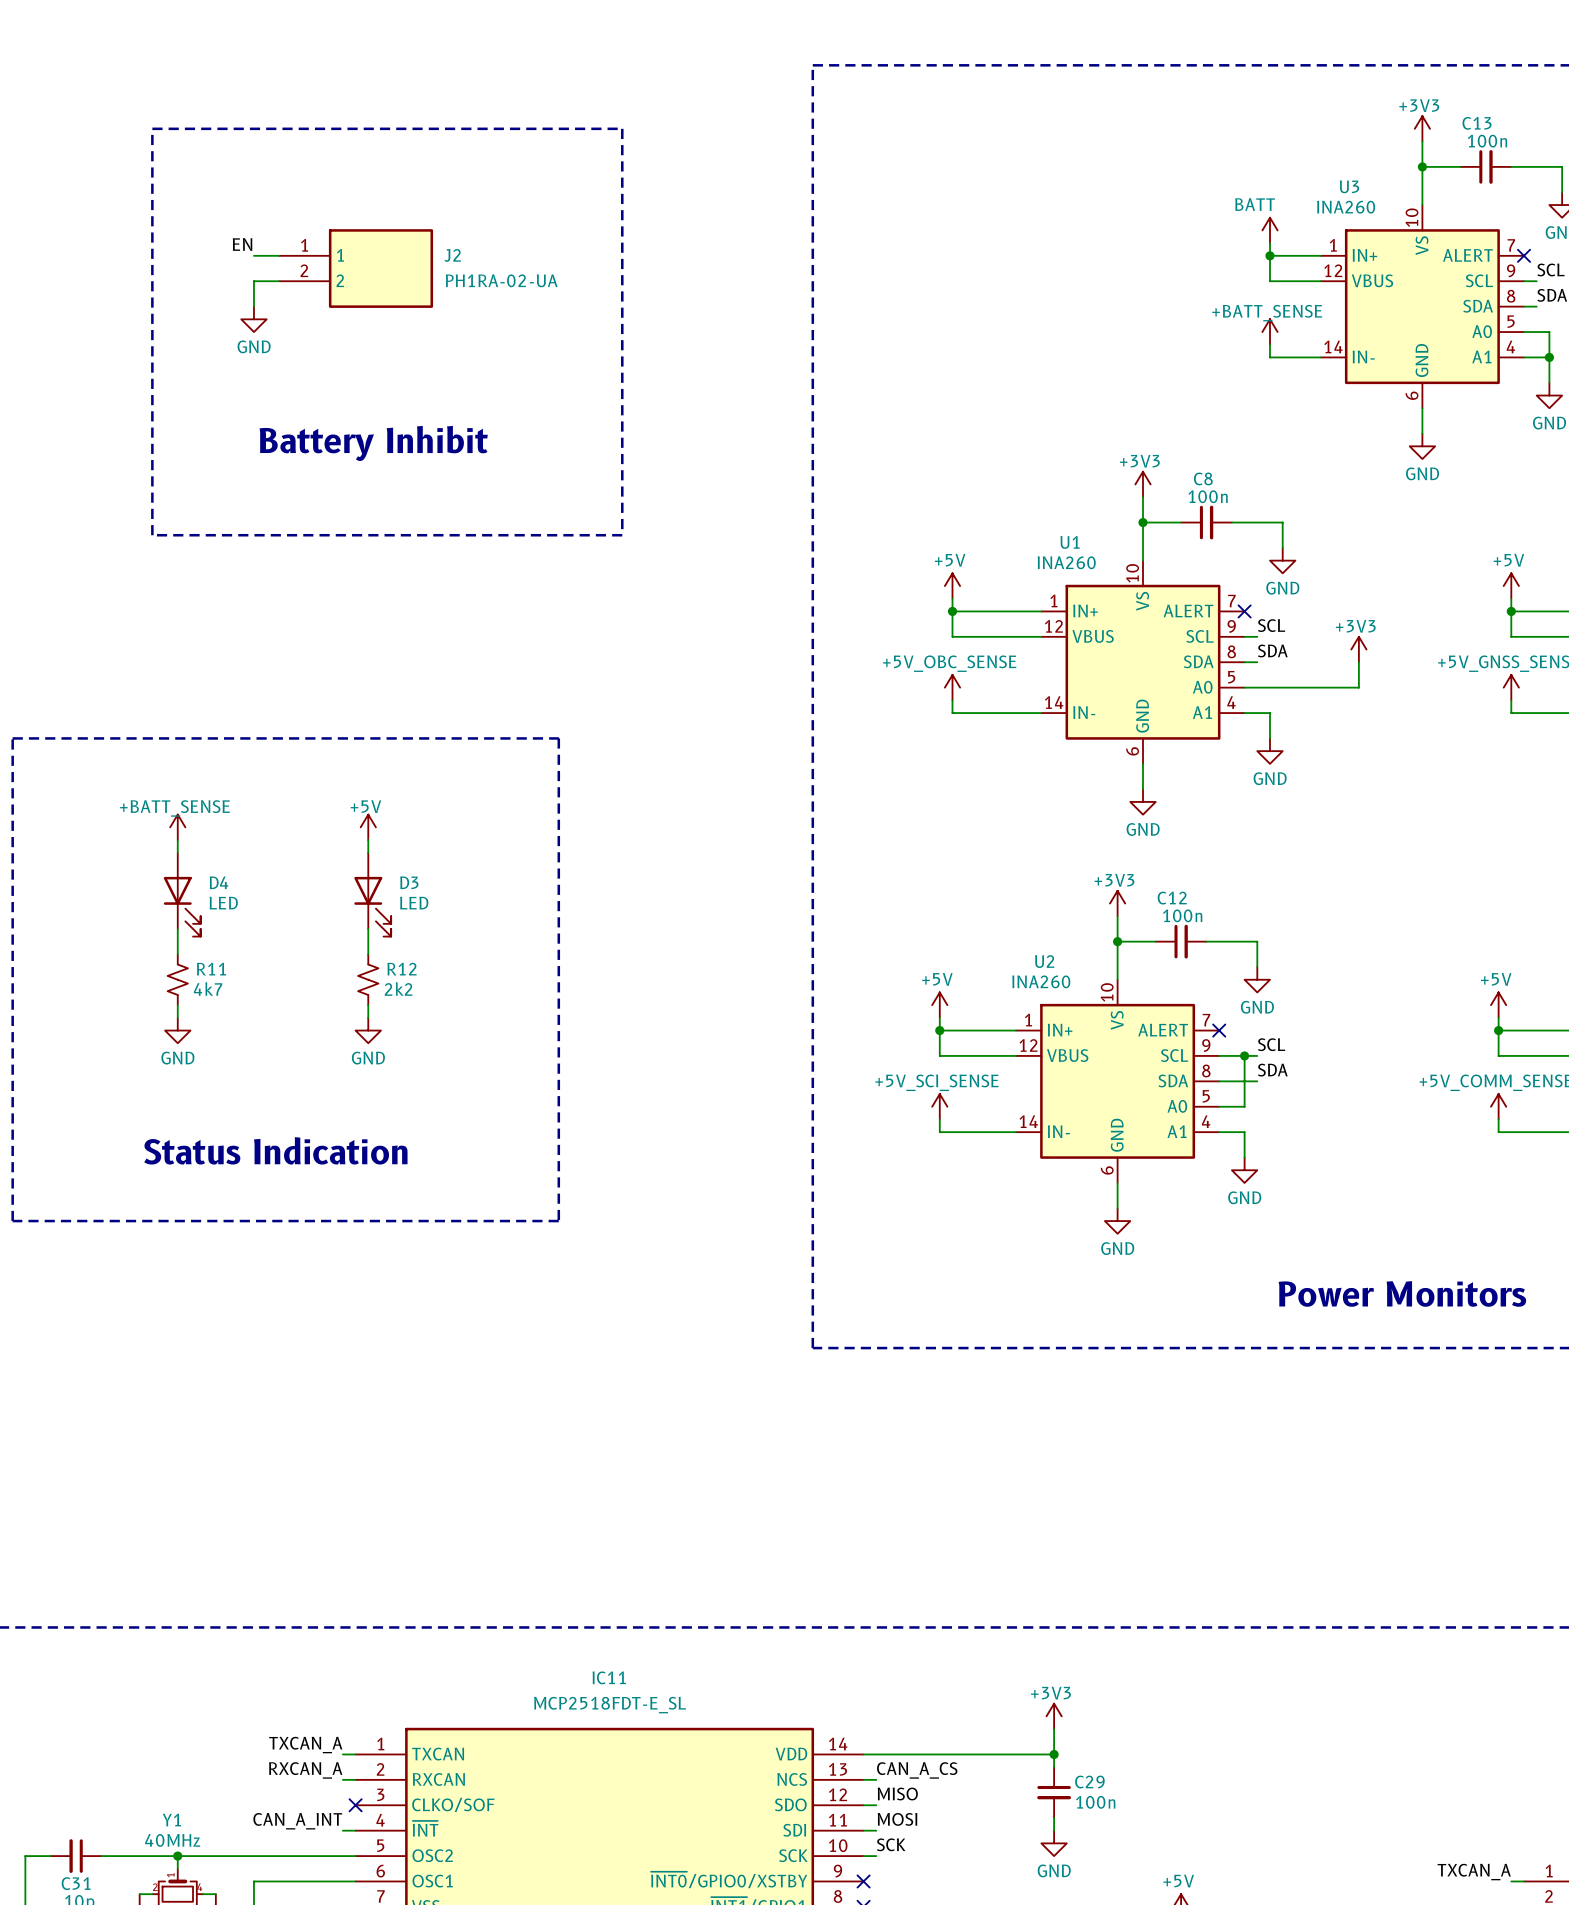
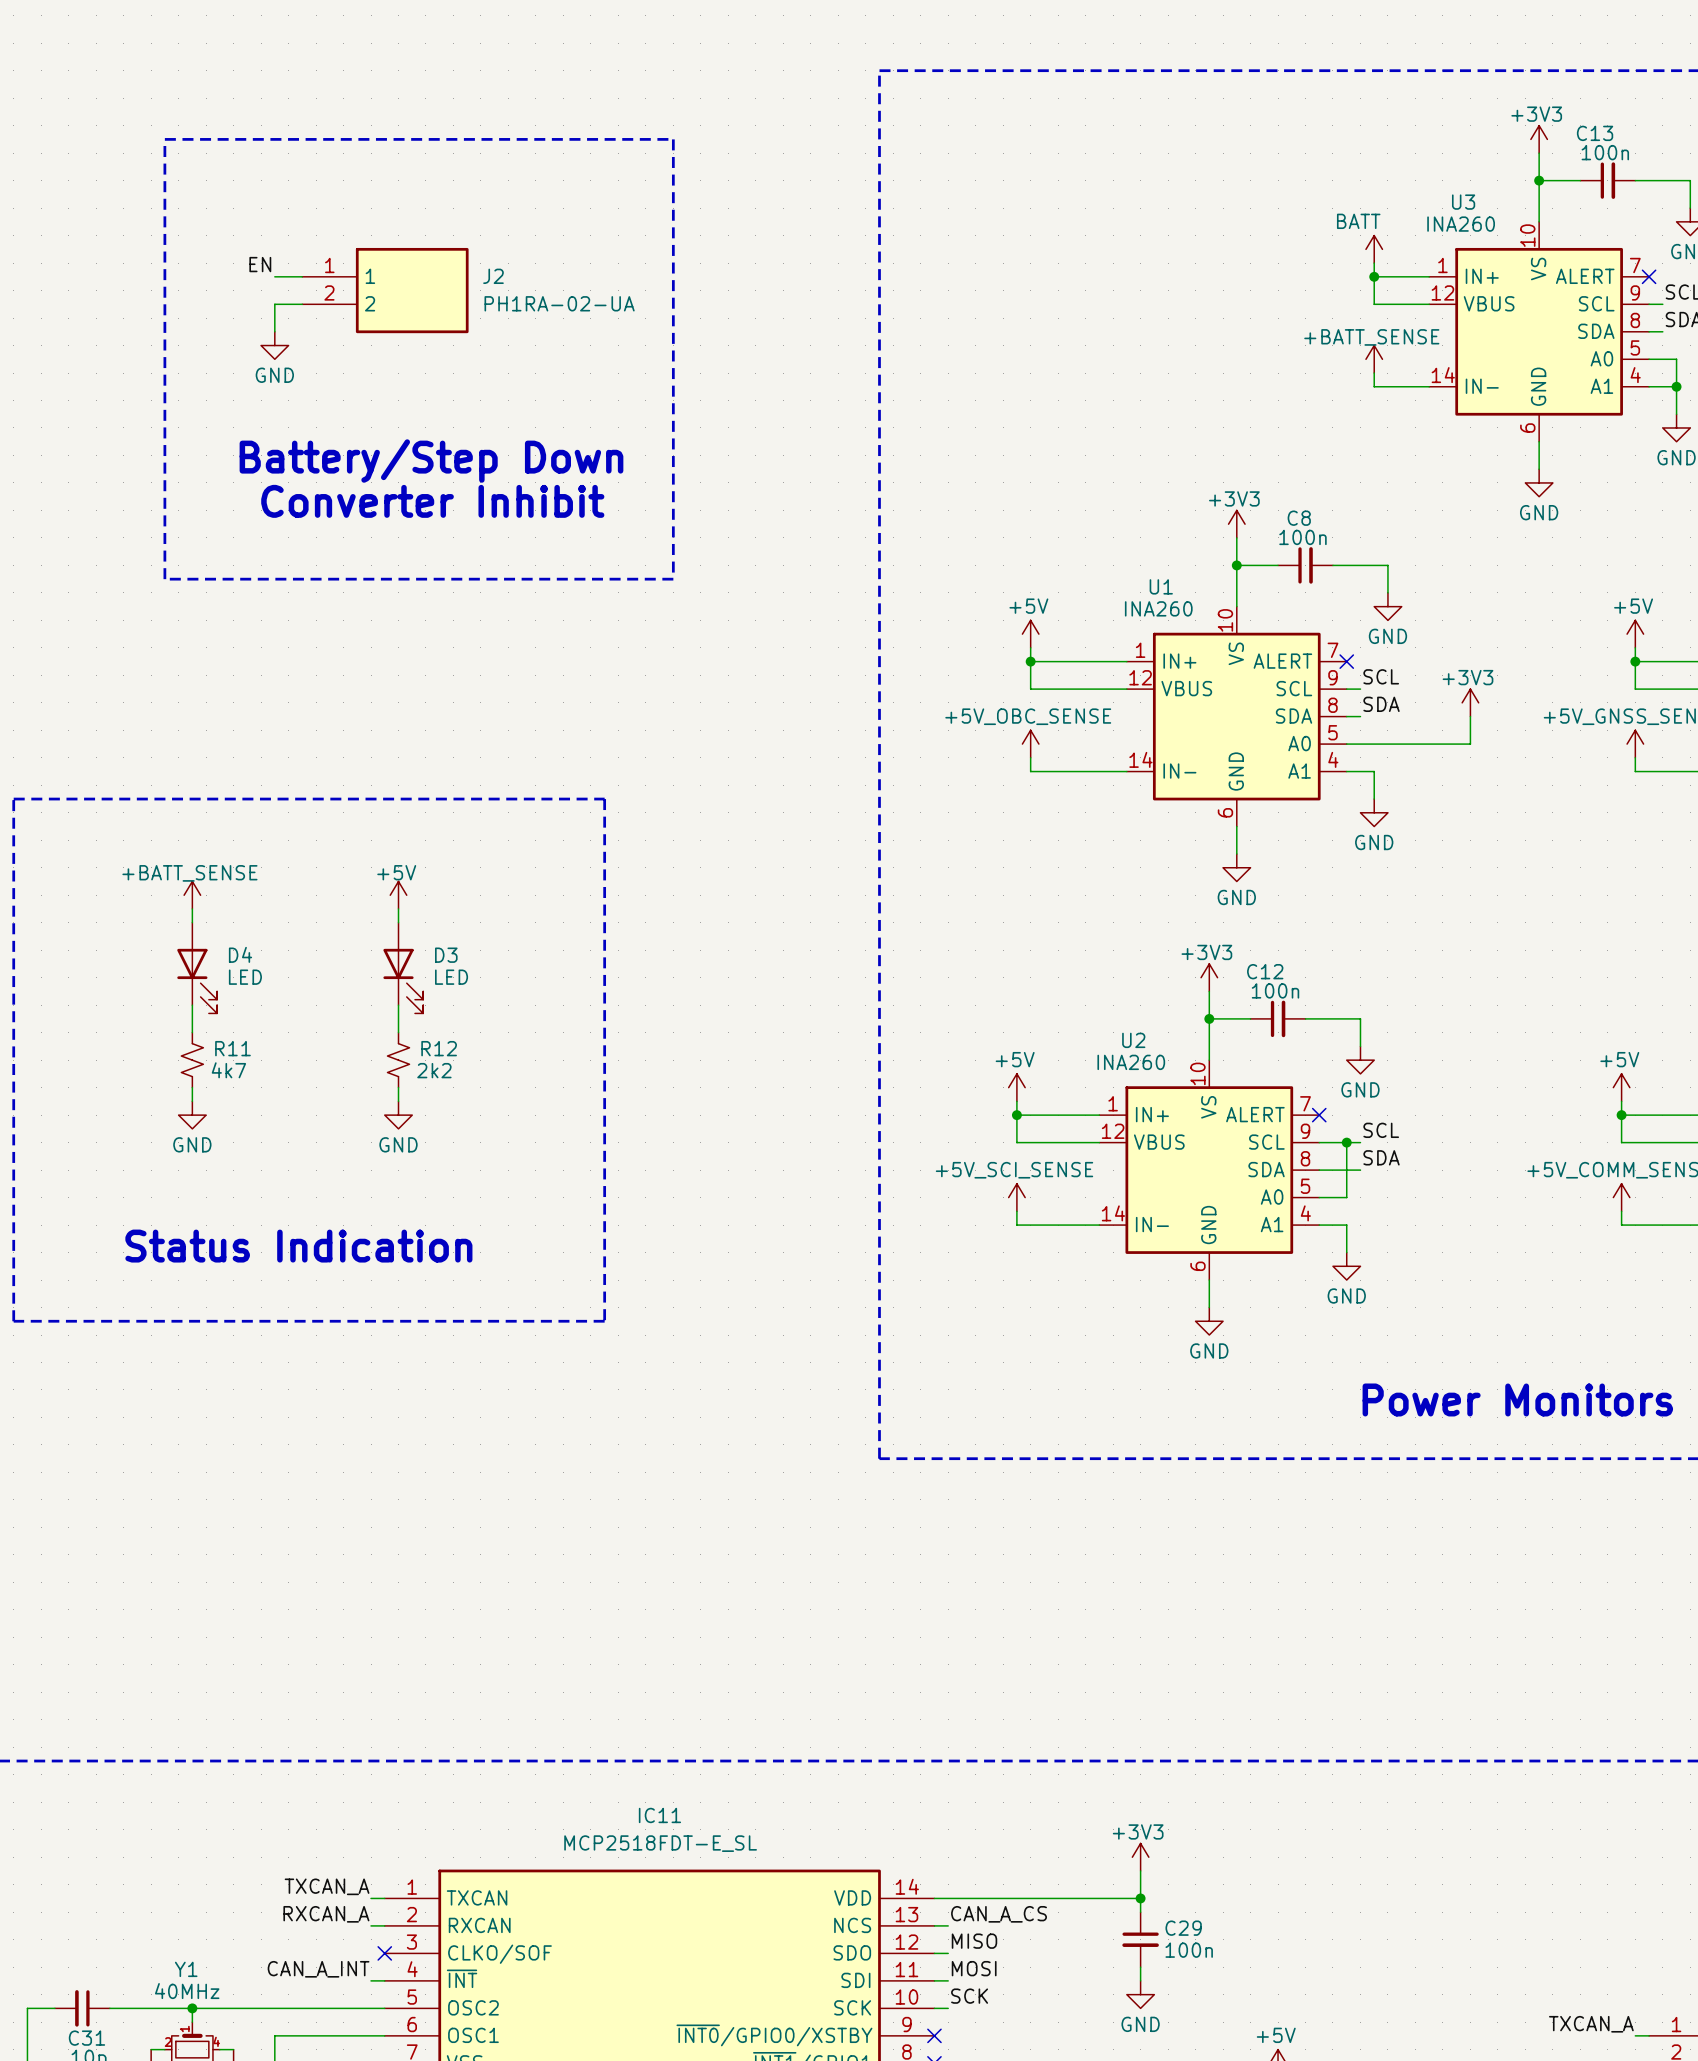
text: none -> Battery/Step Down (431, 461)
text: Battery Inhibit (373, 443) -> Converter Inhibit (432, 501)

